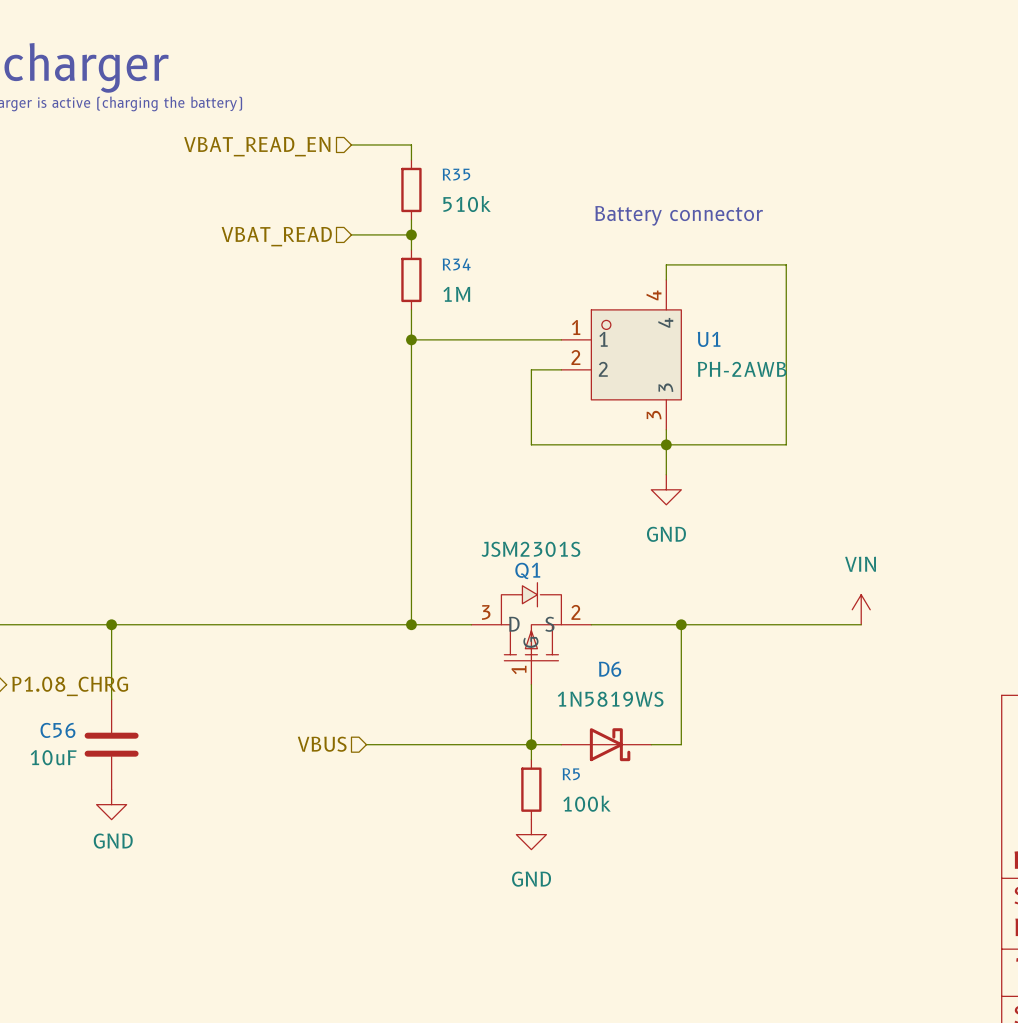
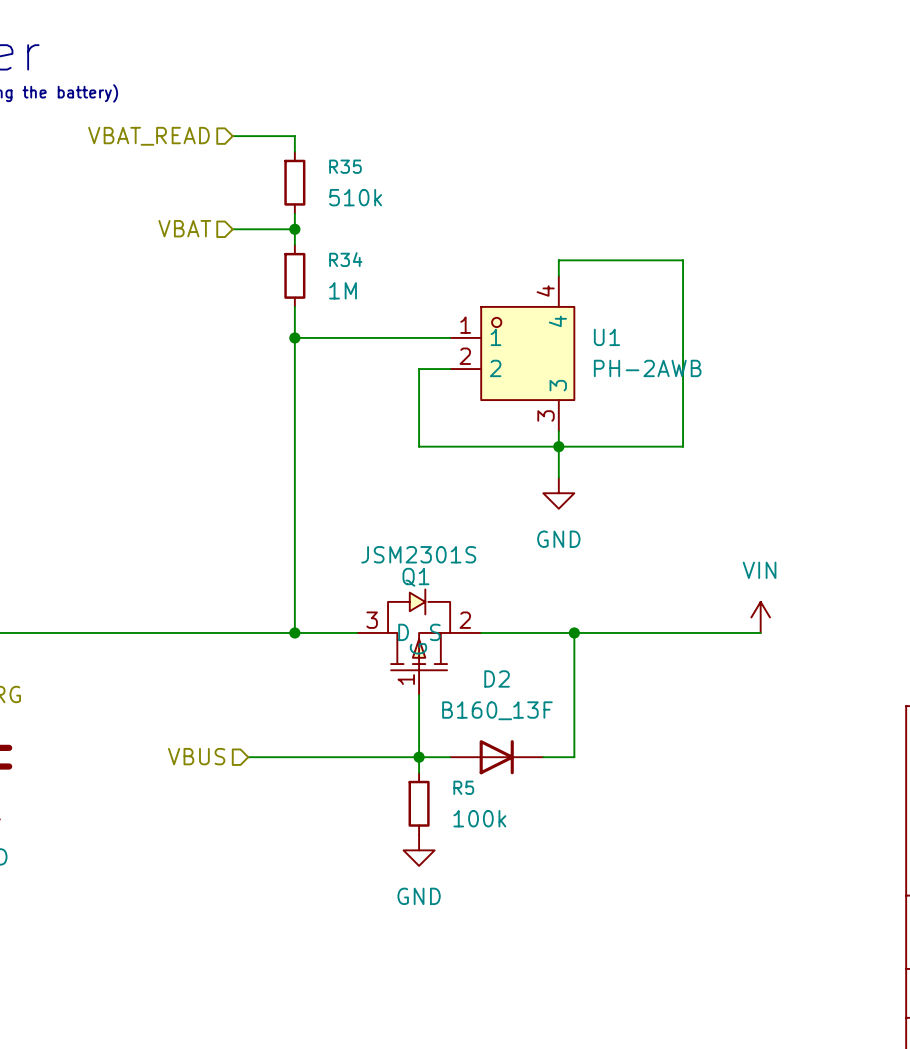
hierarchical label: VBAT_READ_EN (257, 146) -> VBAT_READ (148, 136)
text: Battery connector (679, 215) -> none
hierarchical label: VBAT_READ (276, 236) -> VBAT (184, 228)
D6: 1N5819WS (606, 744) -> none
D2: none -> B160_13F (496, 757)

